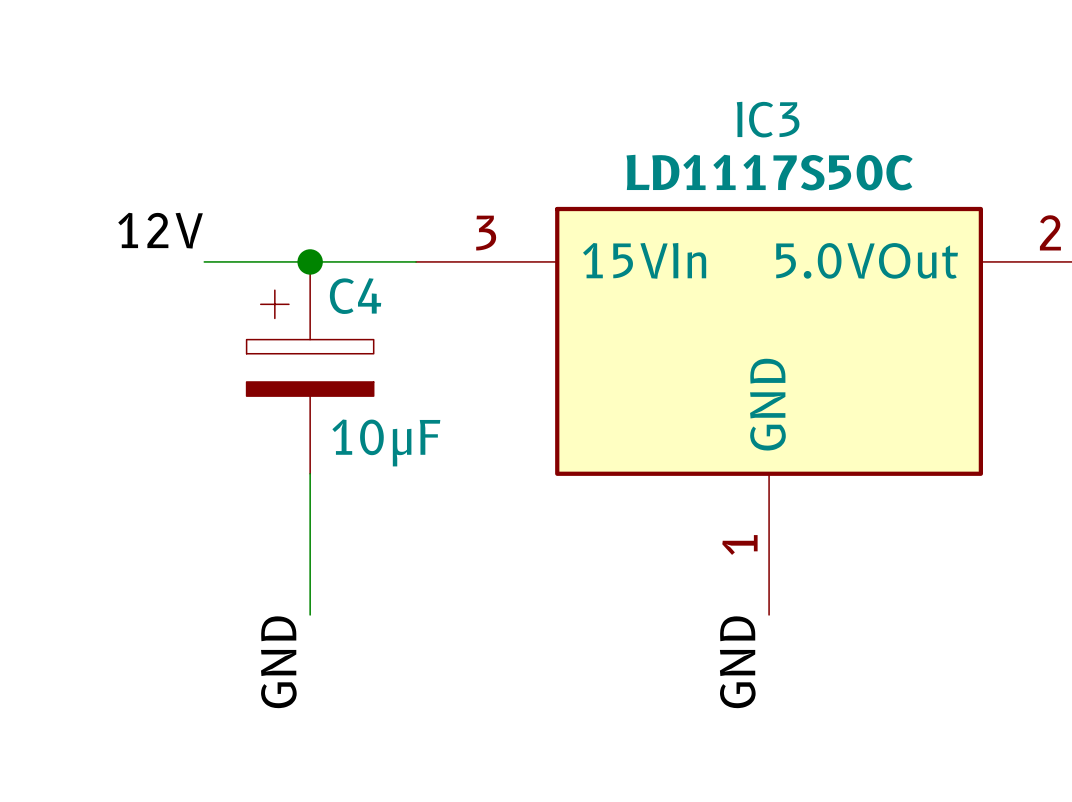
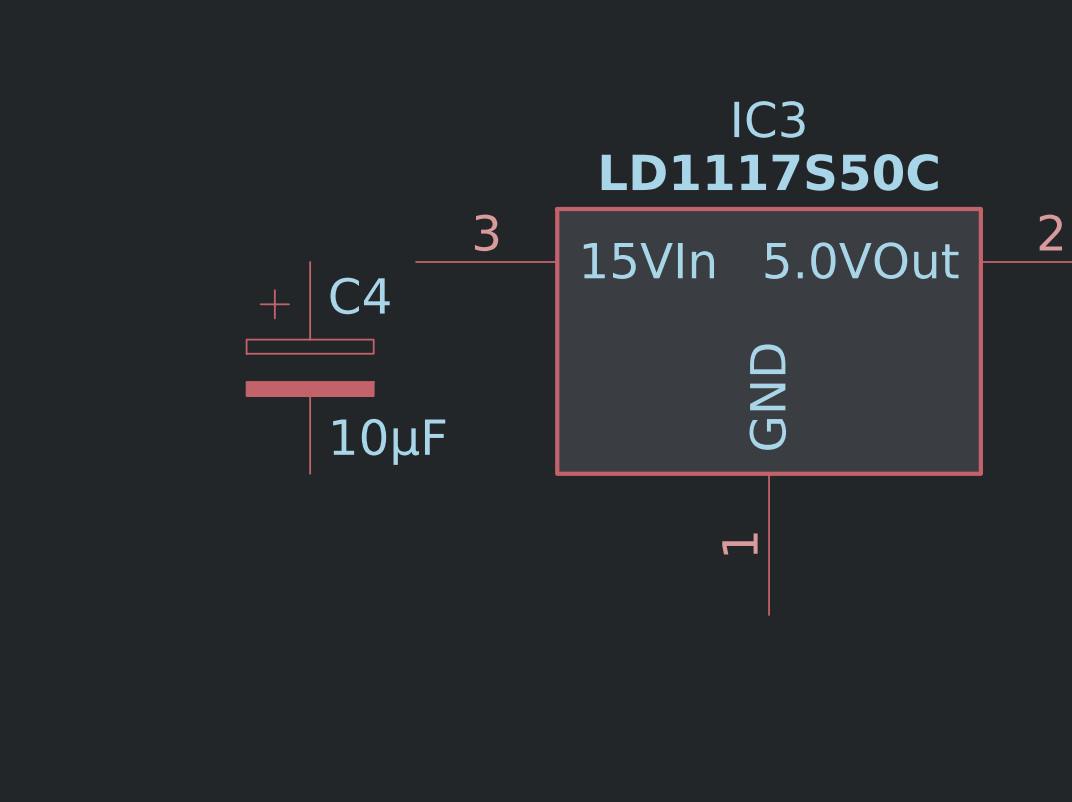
label: 12V (160, 230) -> none
wire: (204, 261) (416, 261) -> none
junction: (310, 261) -> none
wire: (310, 473) (310, 614) -> none
label: GND (278, 662) -> none
label: GND (737, 662) -> none

